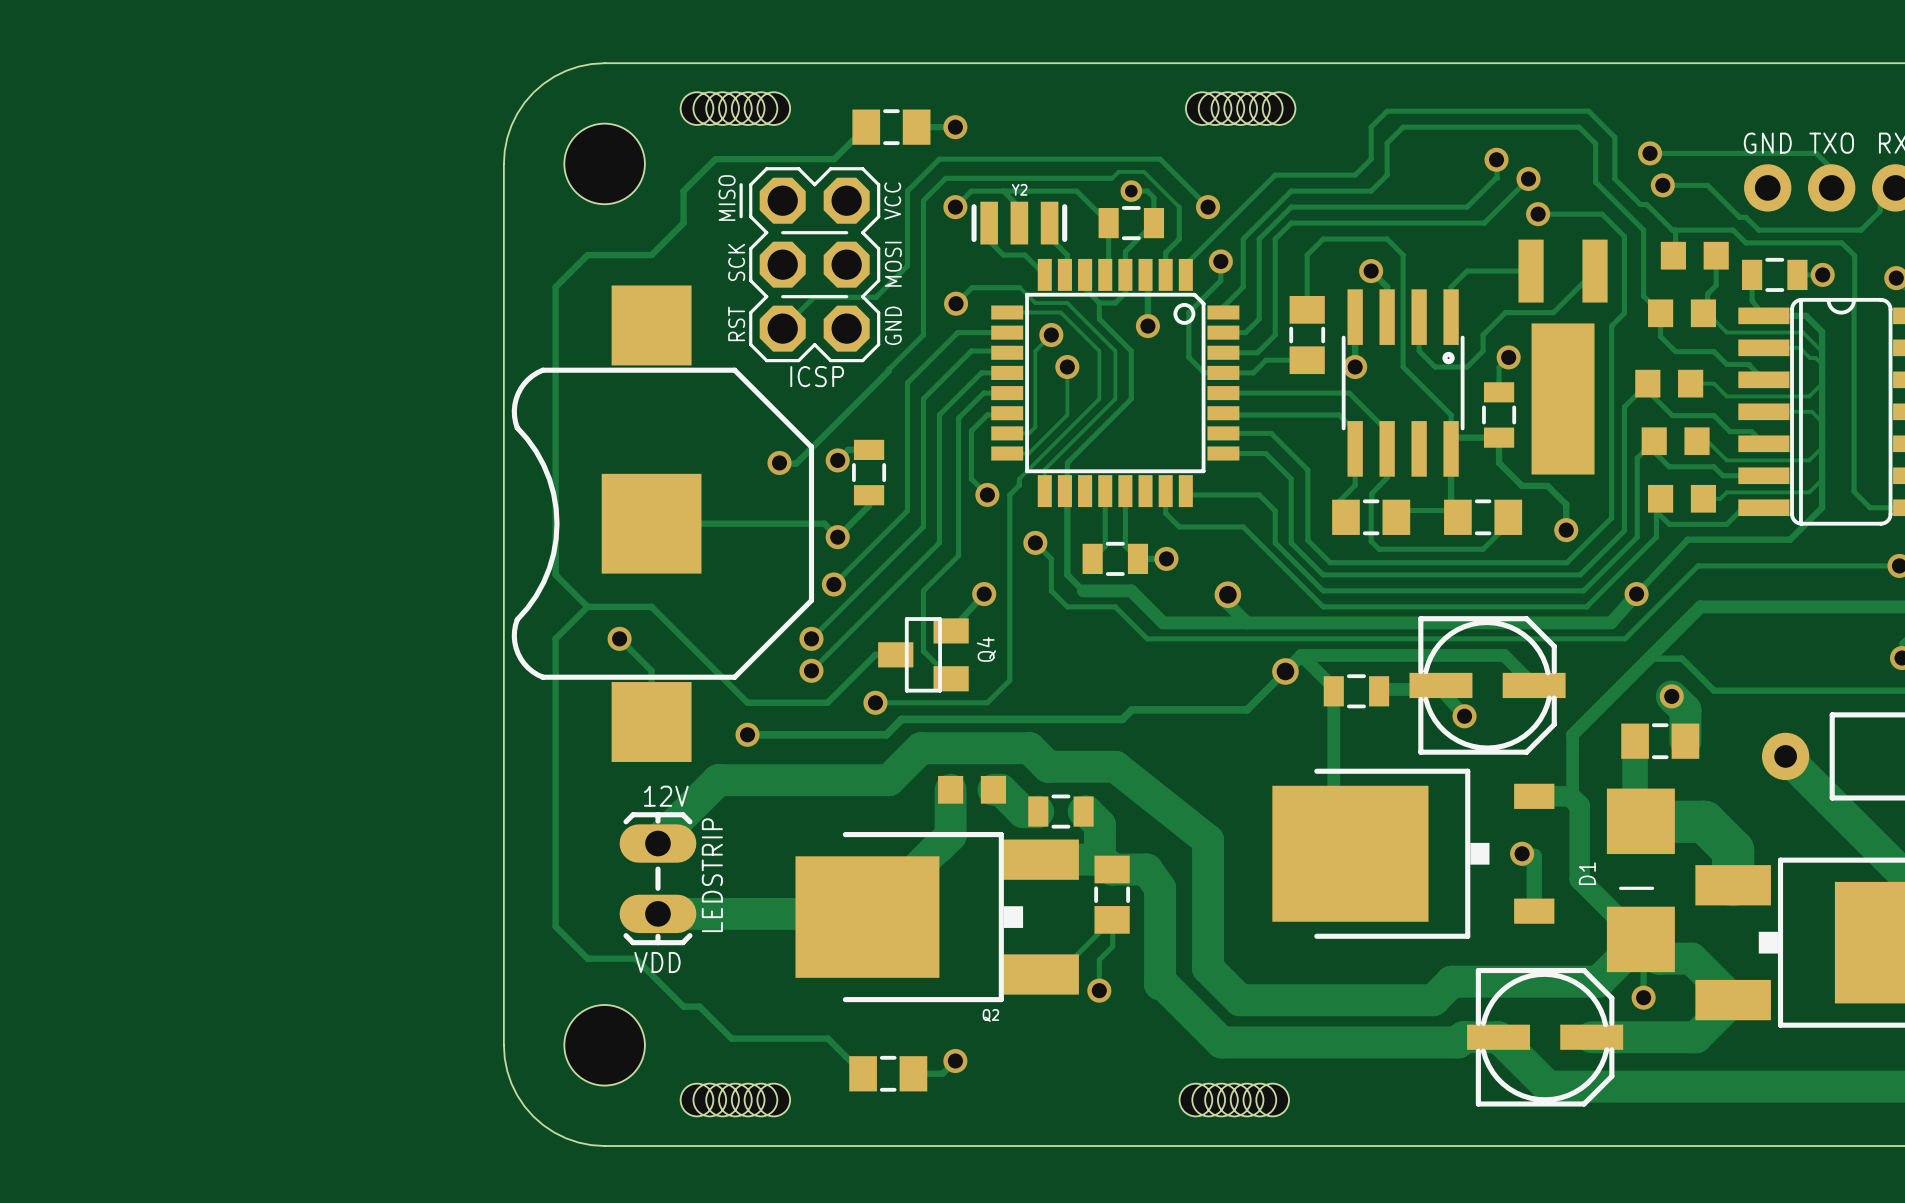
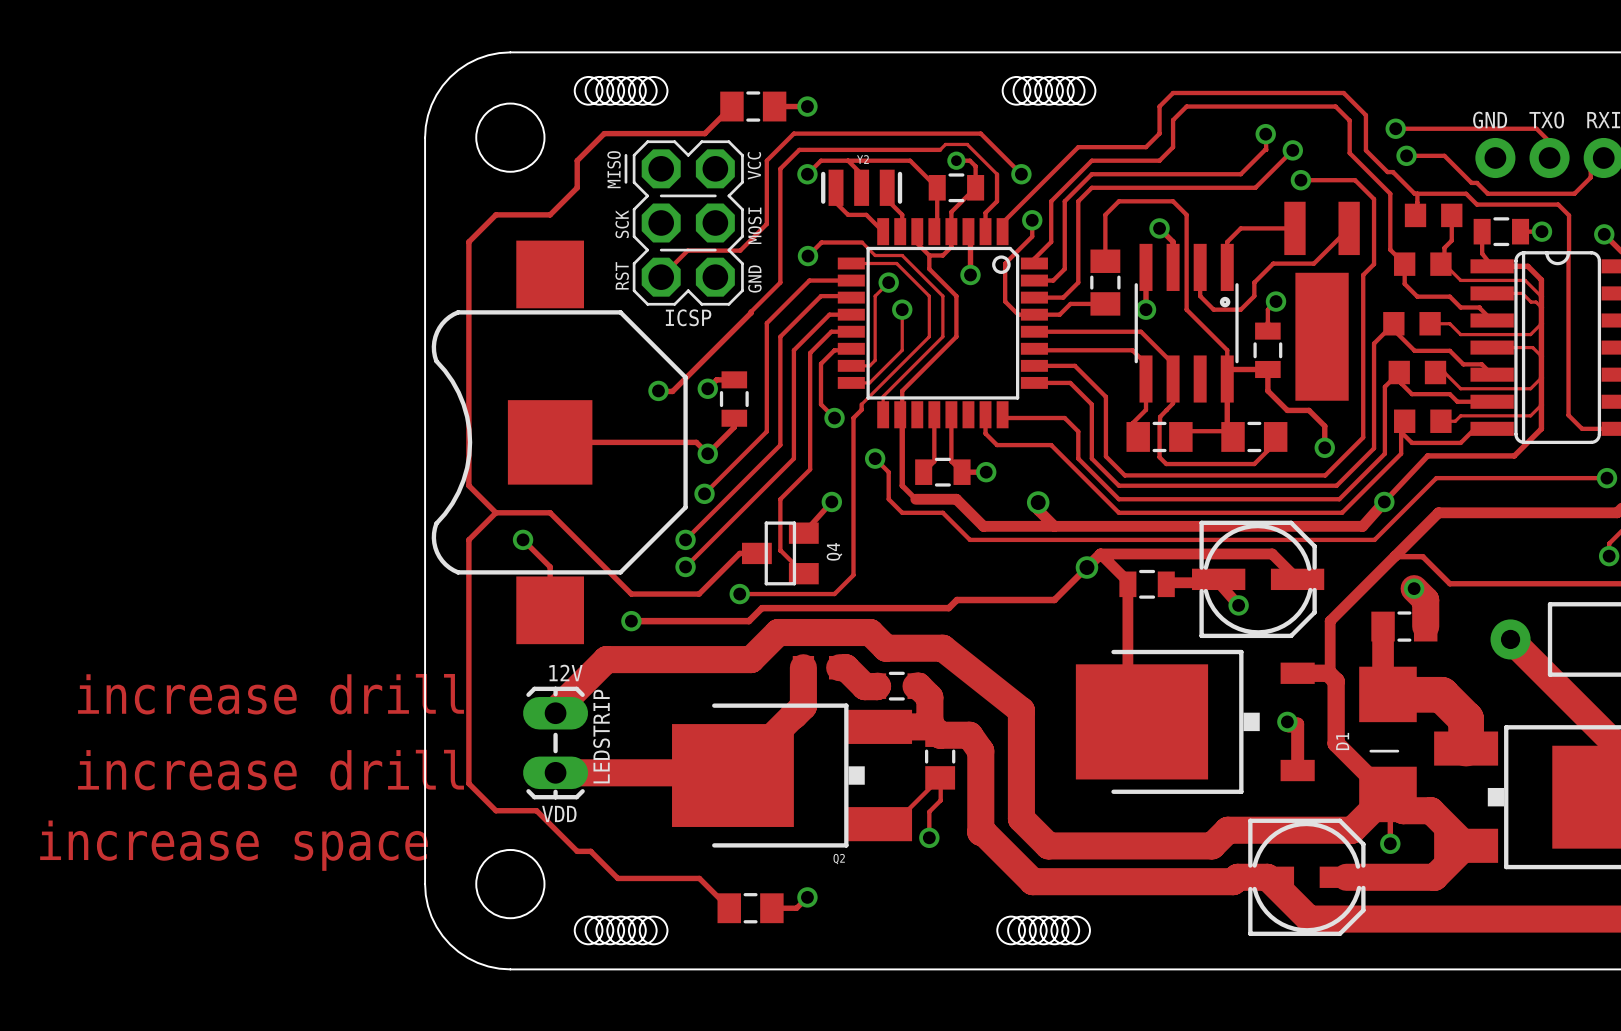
text: none -> increase drill (271, 694)
text: none -> increase drill (271, 770)
text: none -> increase space (234, 845)

